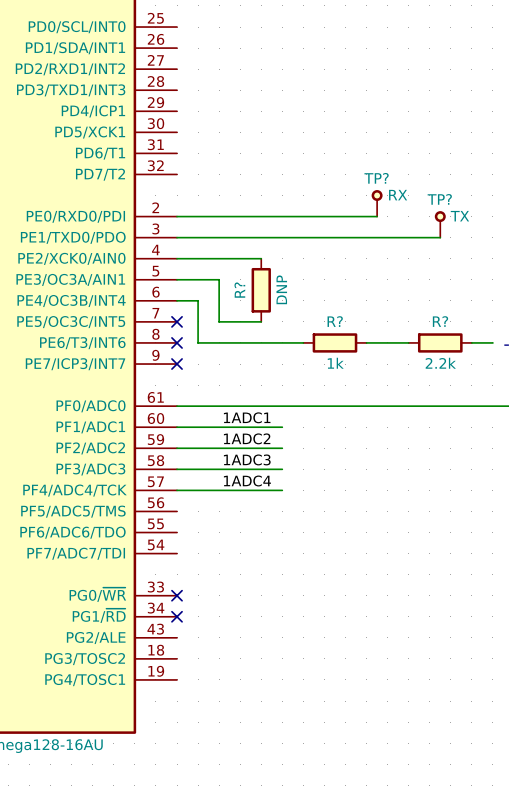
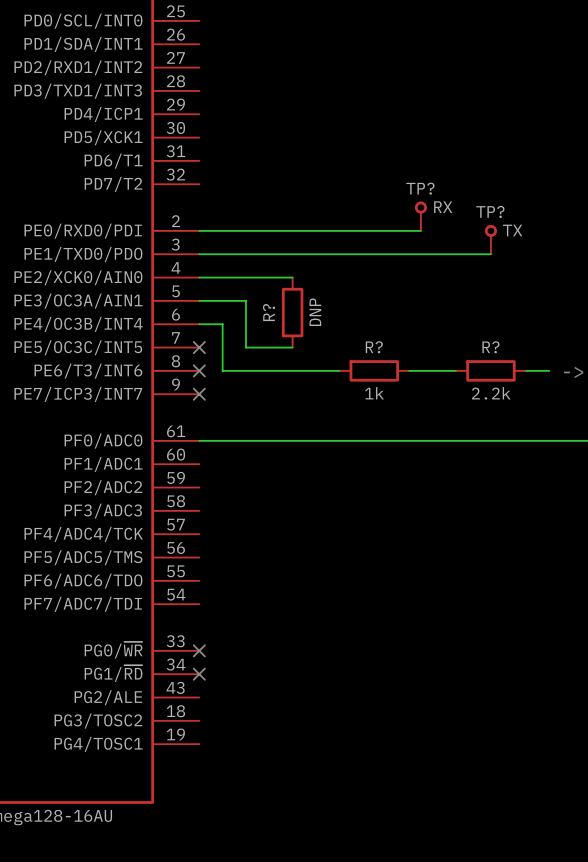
label: 1ADC1 (247, 417) -> none
wire: (177, 427) (282, 427) -> none
label: 1ADC2 (247, 438) -> none
wire: (177, 448) (282, 448) -> none
label: 1ADC3 (247, 459) -> none
wire: (177, 469) (282, 469) -> none
label: 1ADC4 (247, 481) -> none
wire: (177, 490) (282, 490) -> none

